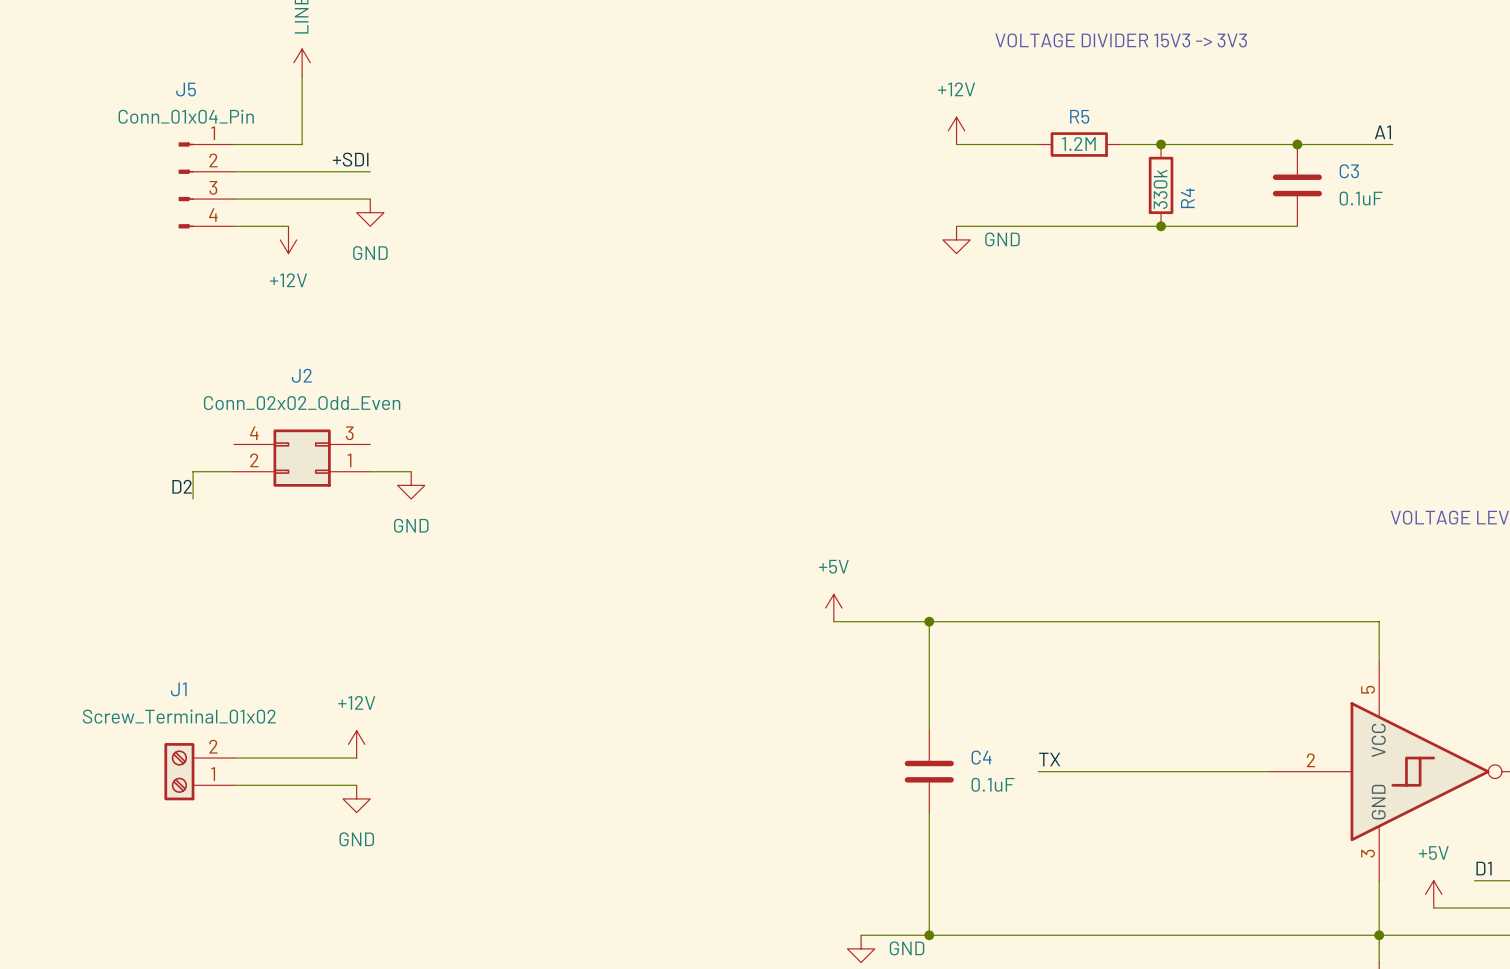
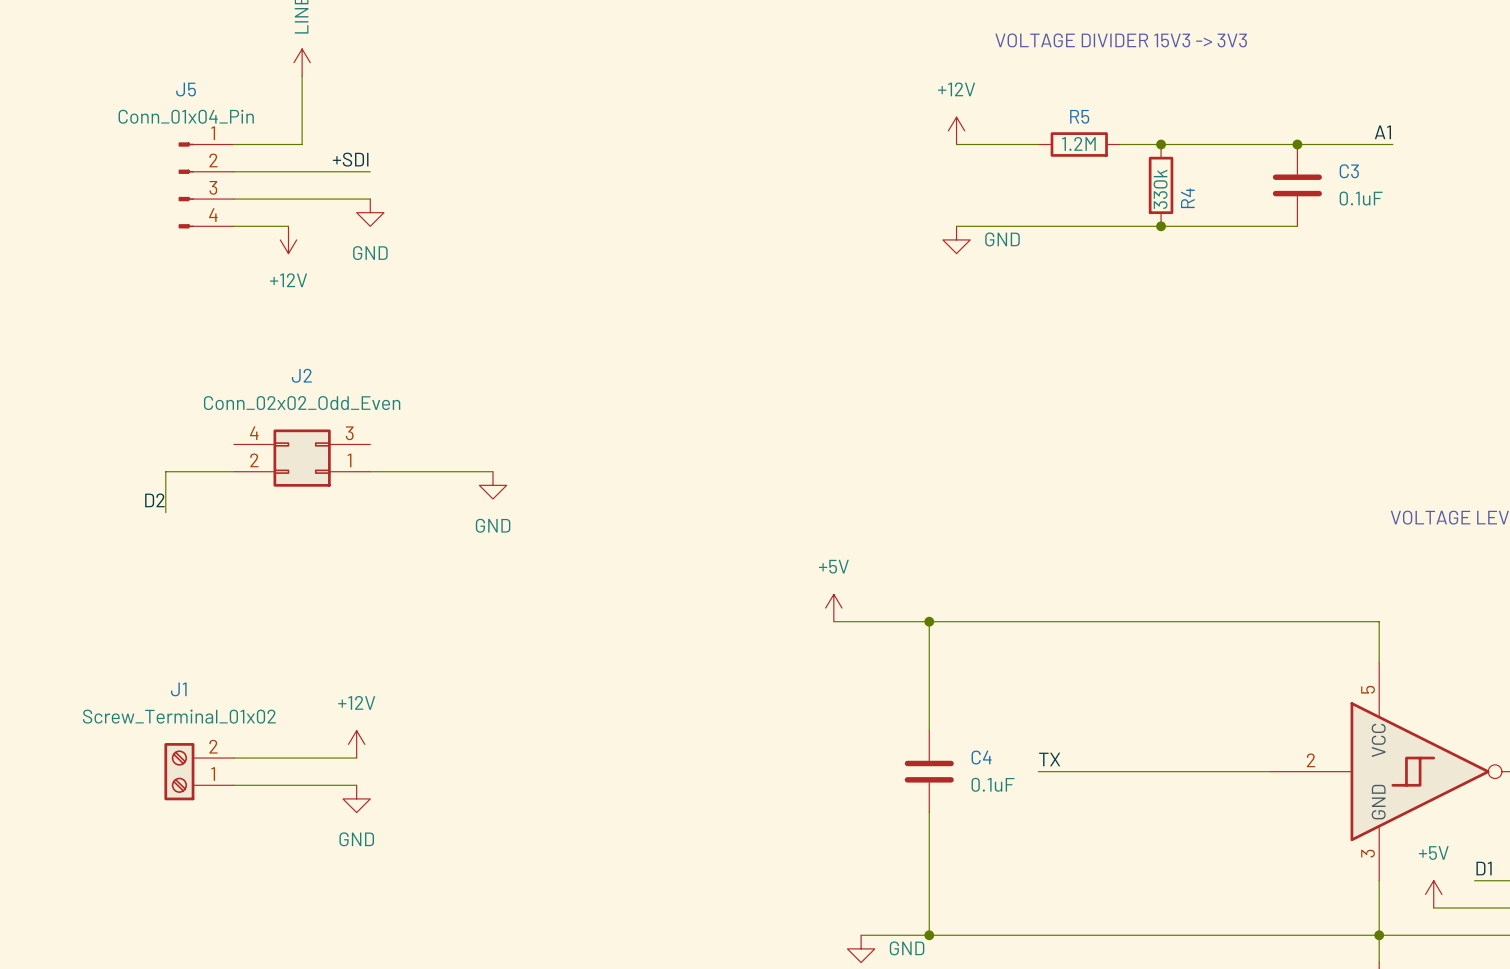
wire: (193, 471) (193, 498) -> (193, 471) (165, 471) (165, 512)
wire: none -> (411, 471) (492, 471)
power symbol position: GND (411, 485) -> GND (492, 485)
label position: D2 (182, 486) -> D2 (154, 500)

